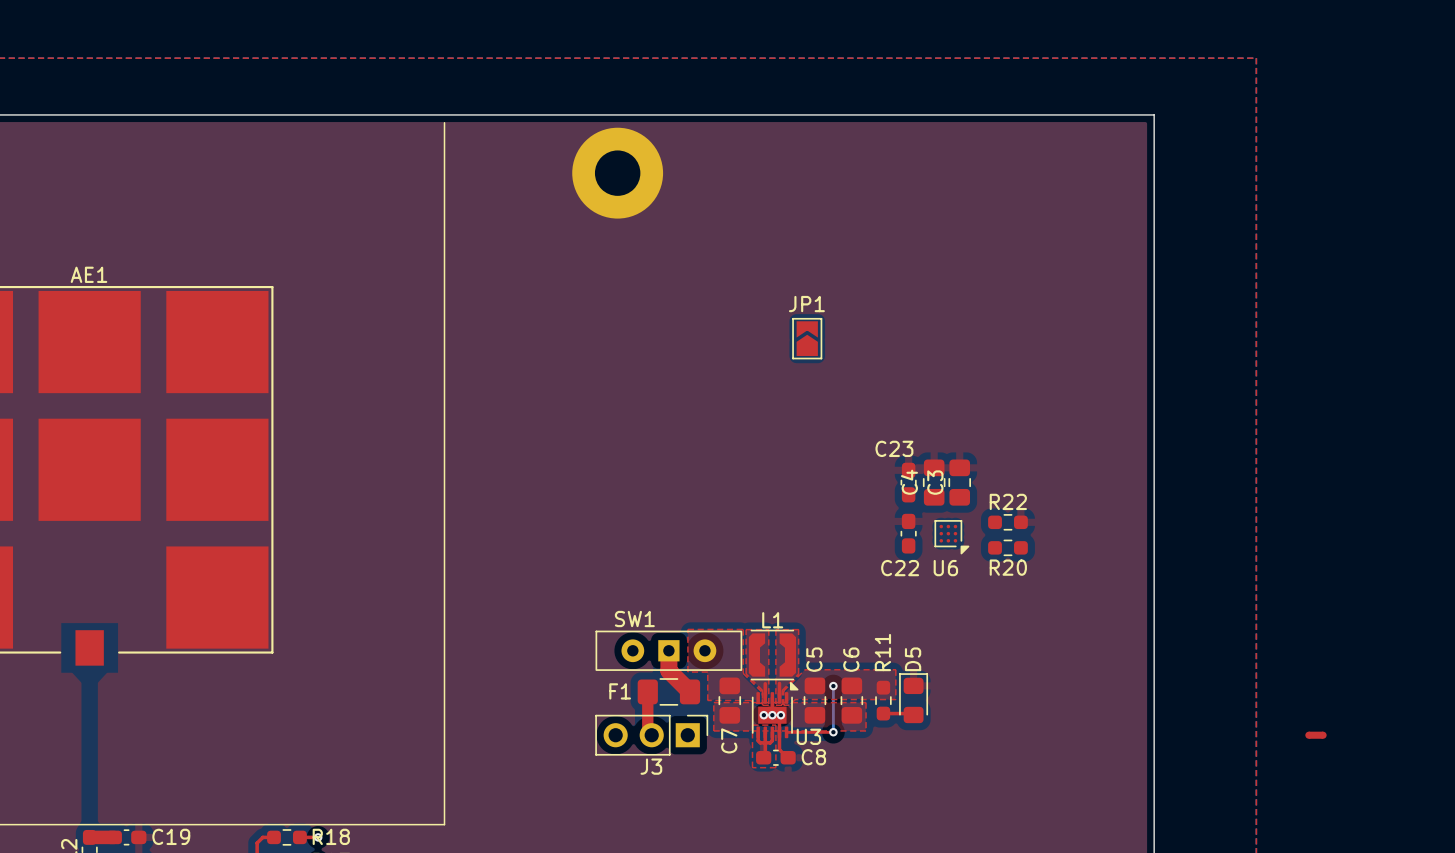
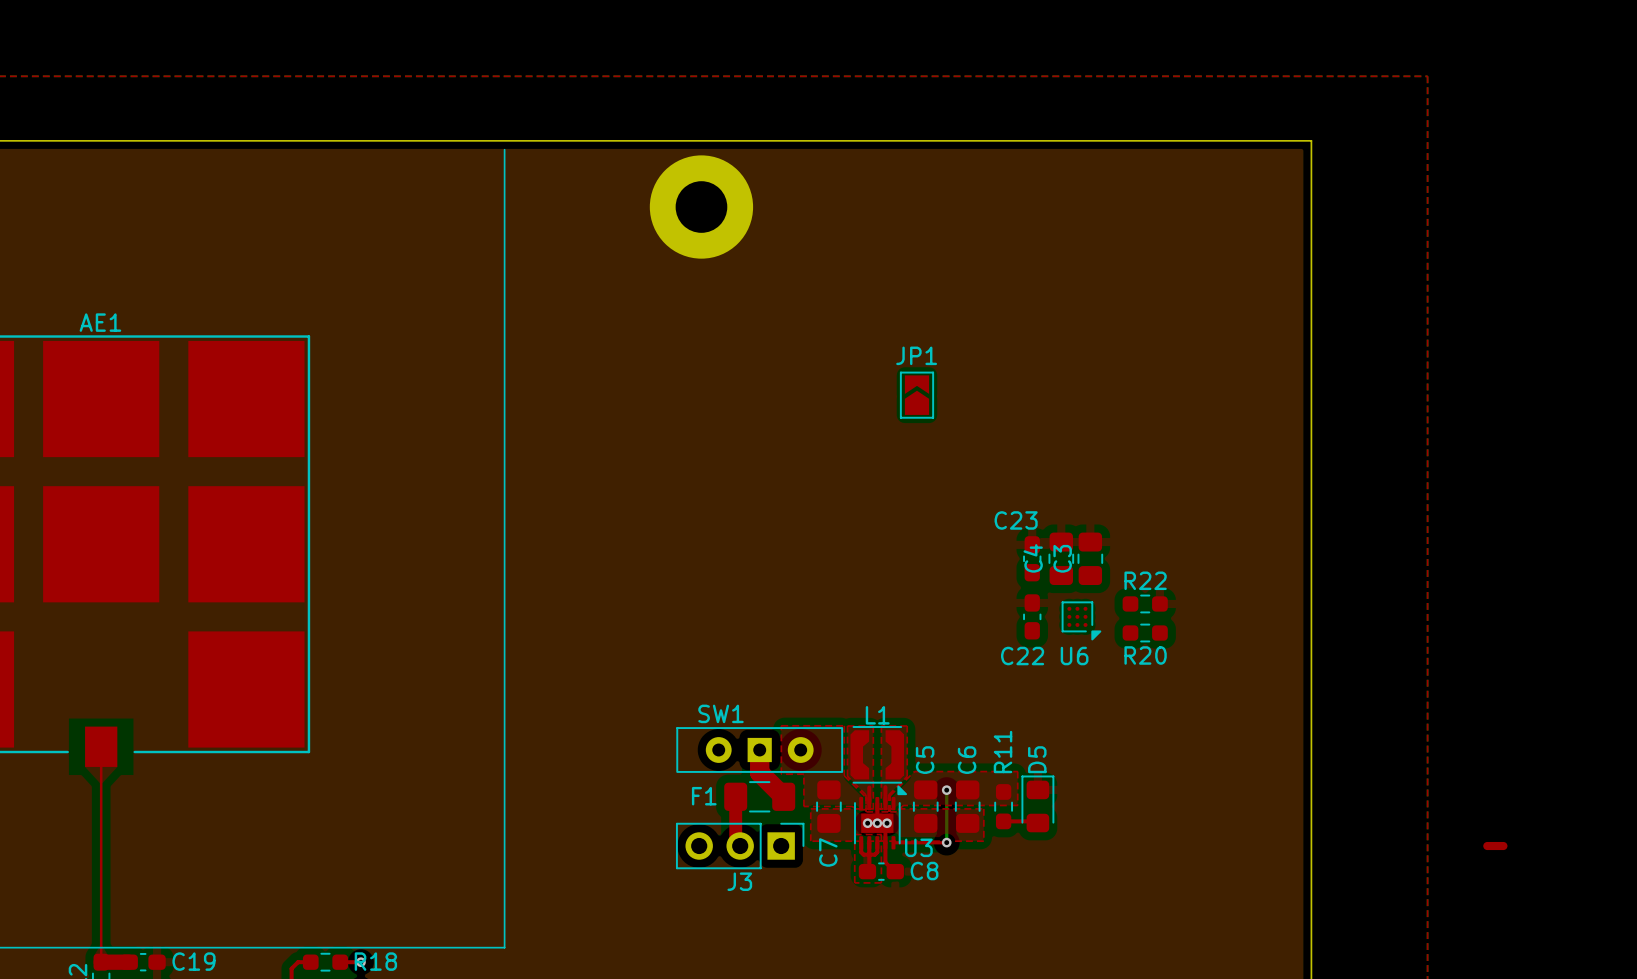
top track: none -> (101, 746) (101, 962)

